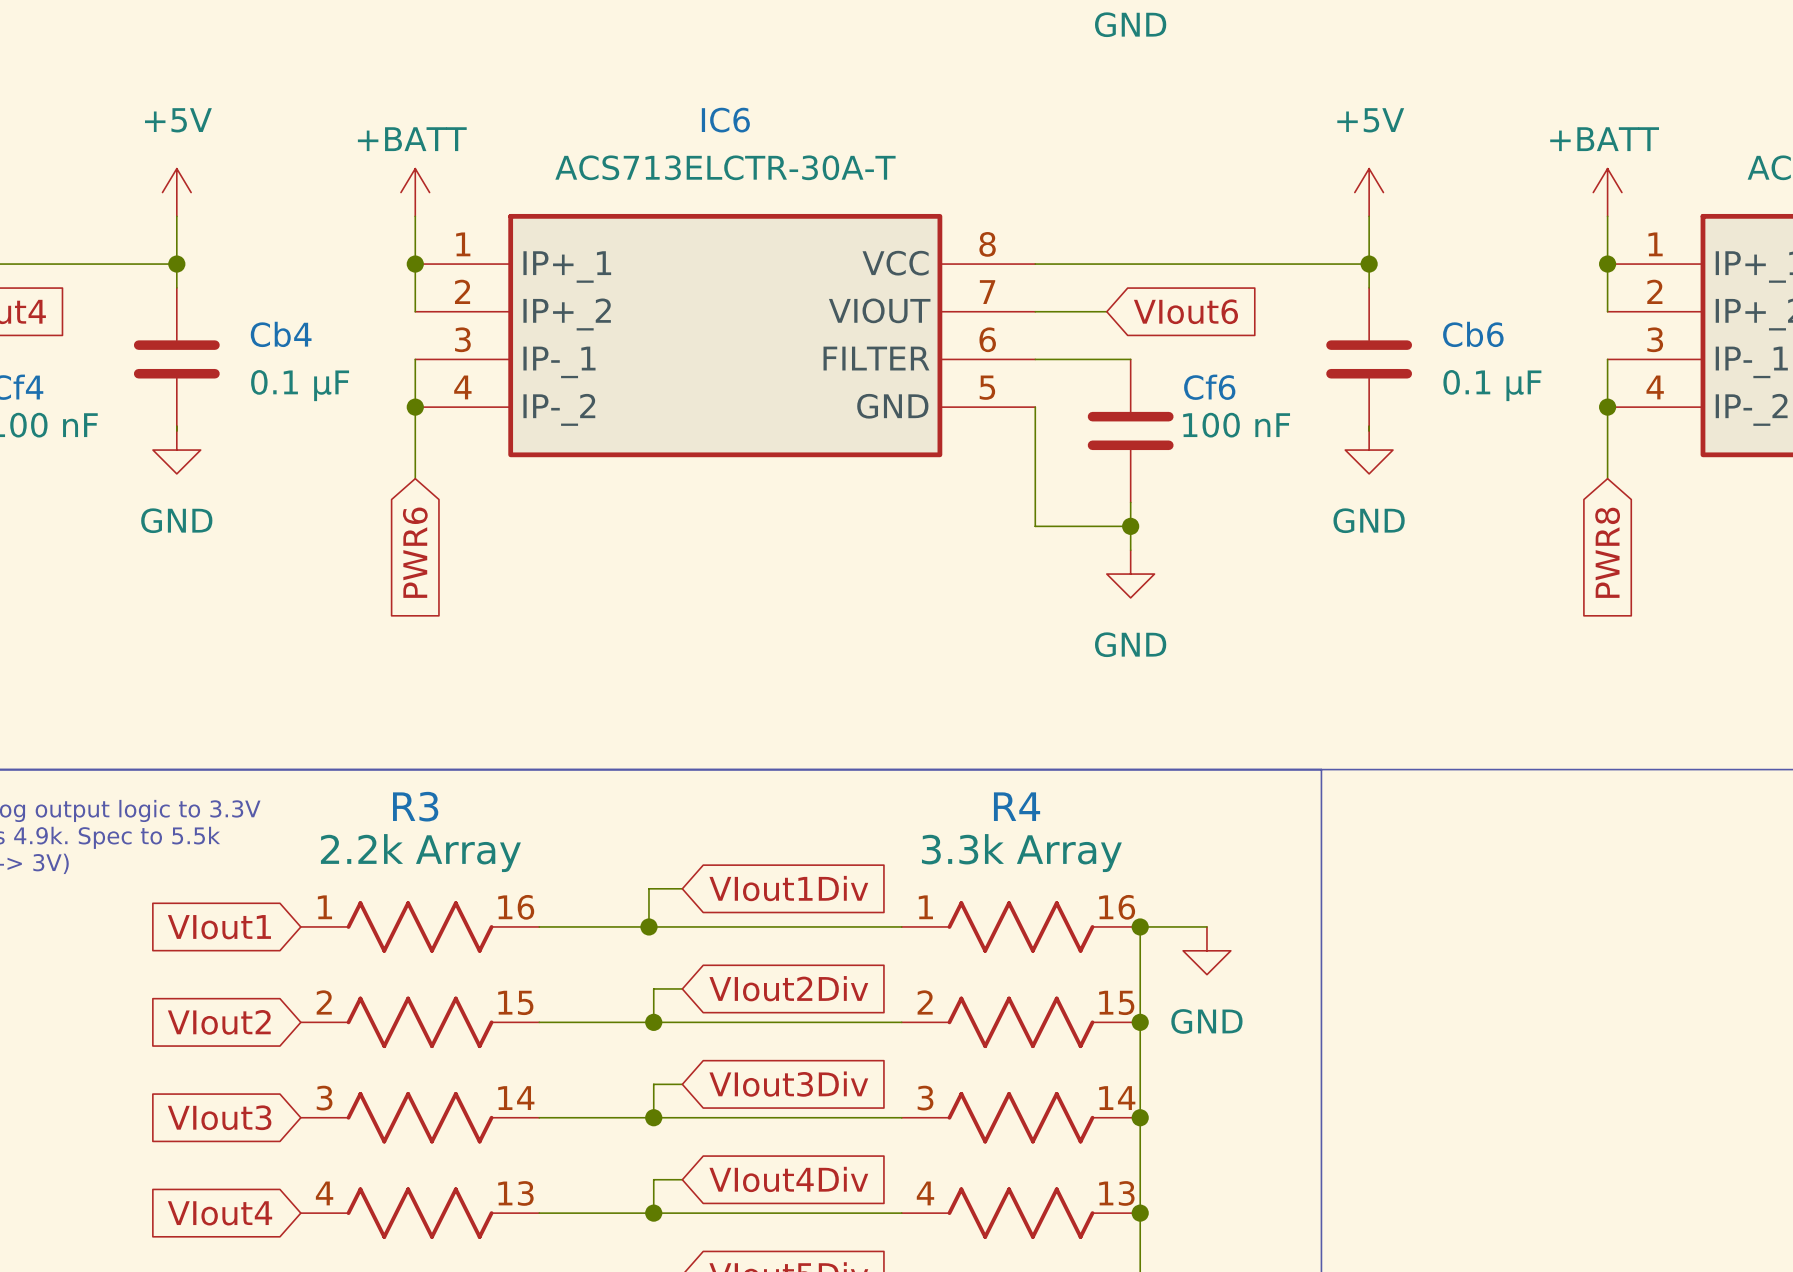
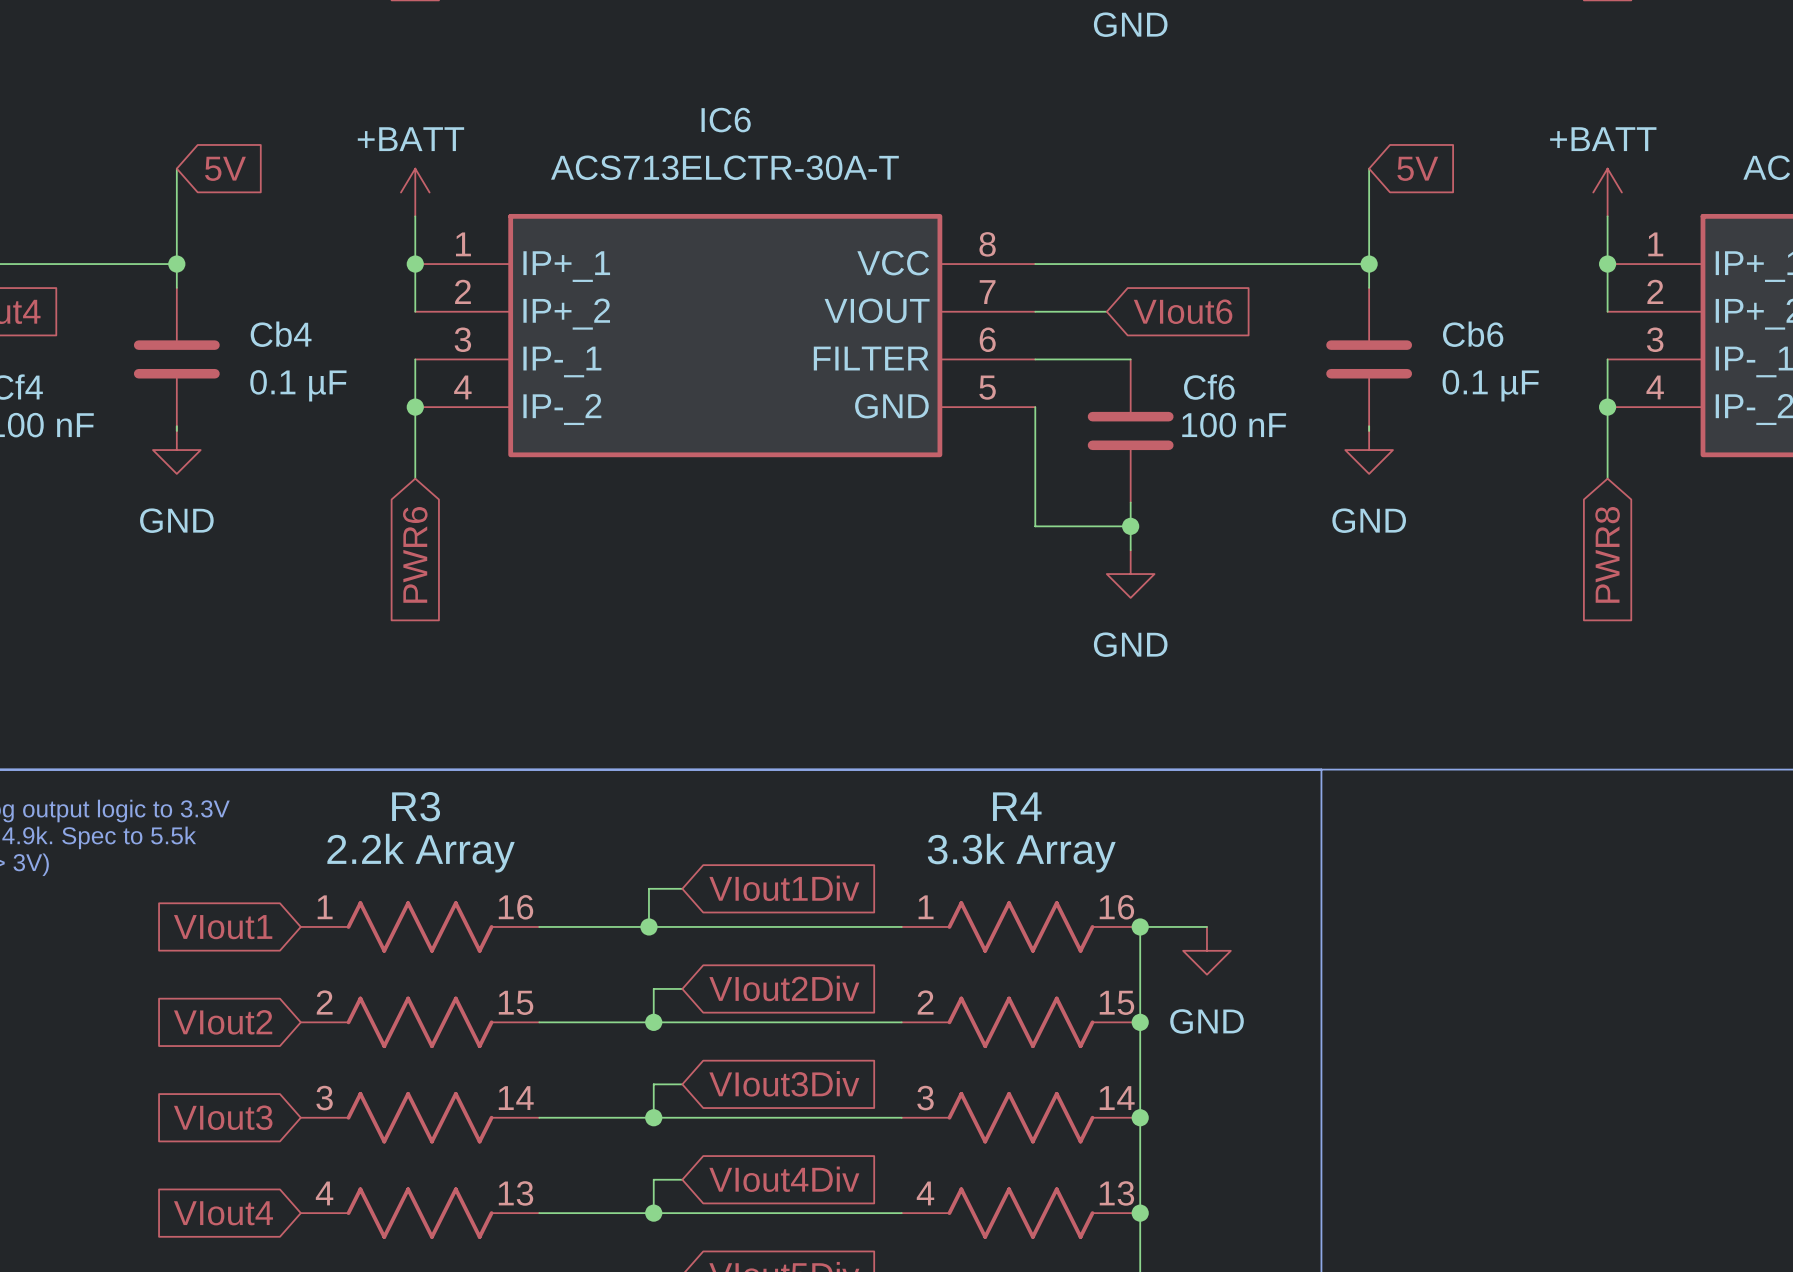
global label: none -> 5V (225, 168)
global label: none -> 5V (1417, 168)
power symbol: +5V (176, 192) -> none
power symbol: +5V (1369, 192) -> none

